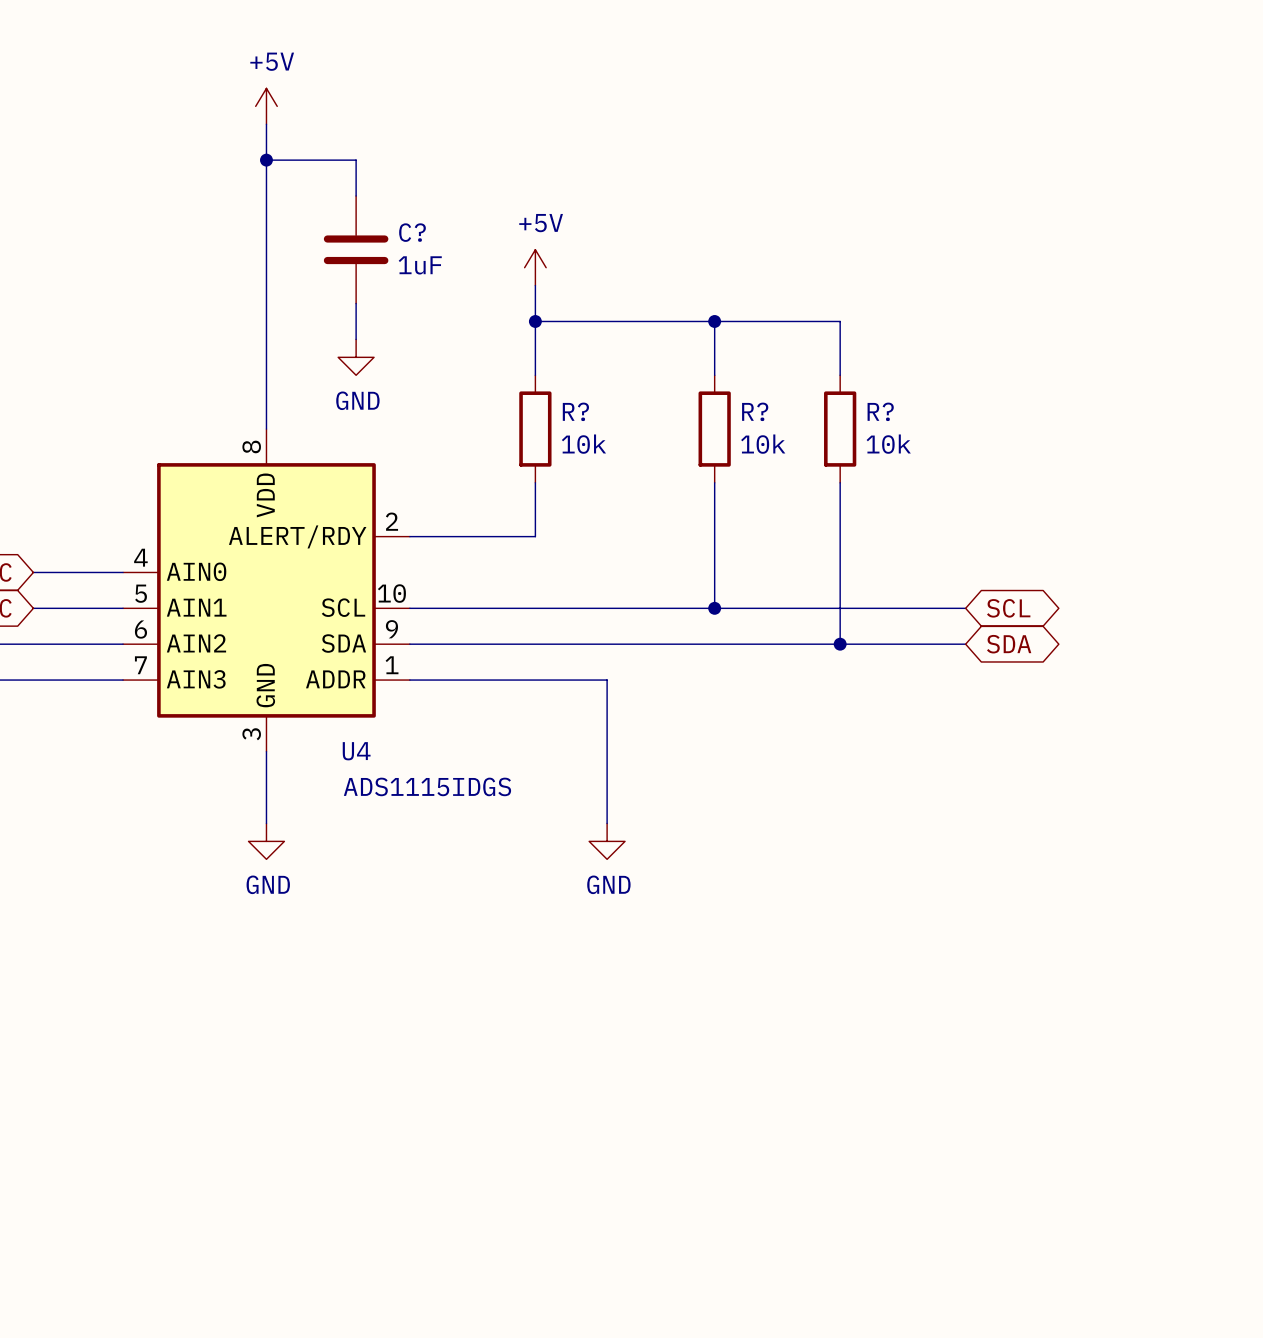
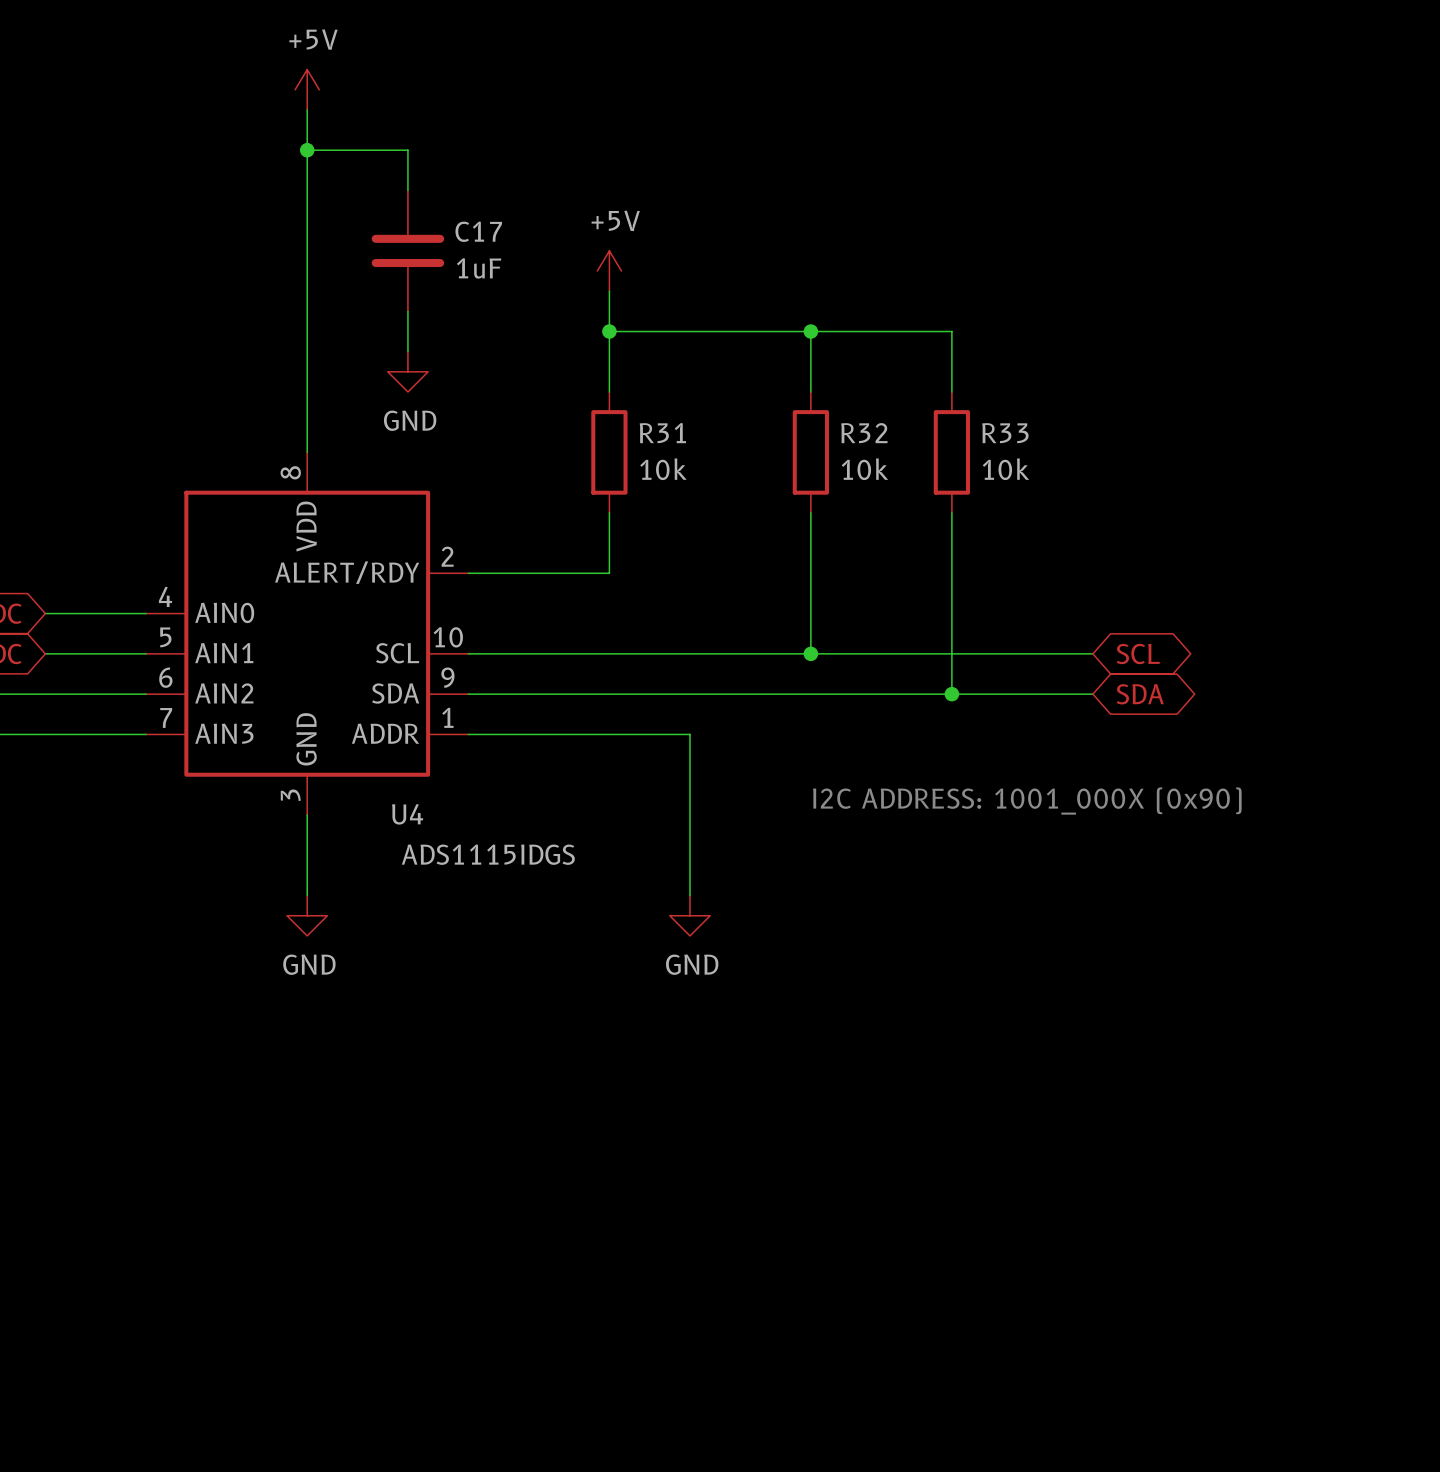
C? name: C? (412, 232) -> C17 (478, 231)
R? name: R? (575, 411) -> R31 (662, 433)
R? name: R? (755, 411) -> R32 (864, 433)
R? name: R? (880, 411) -> R33 (1005, 433)
text: none -> I2C ADDRESS: 1001_000X (0x90) (1027, 801)

